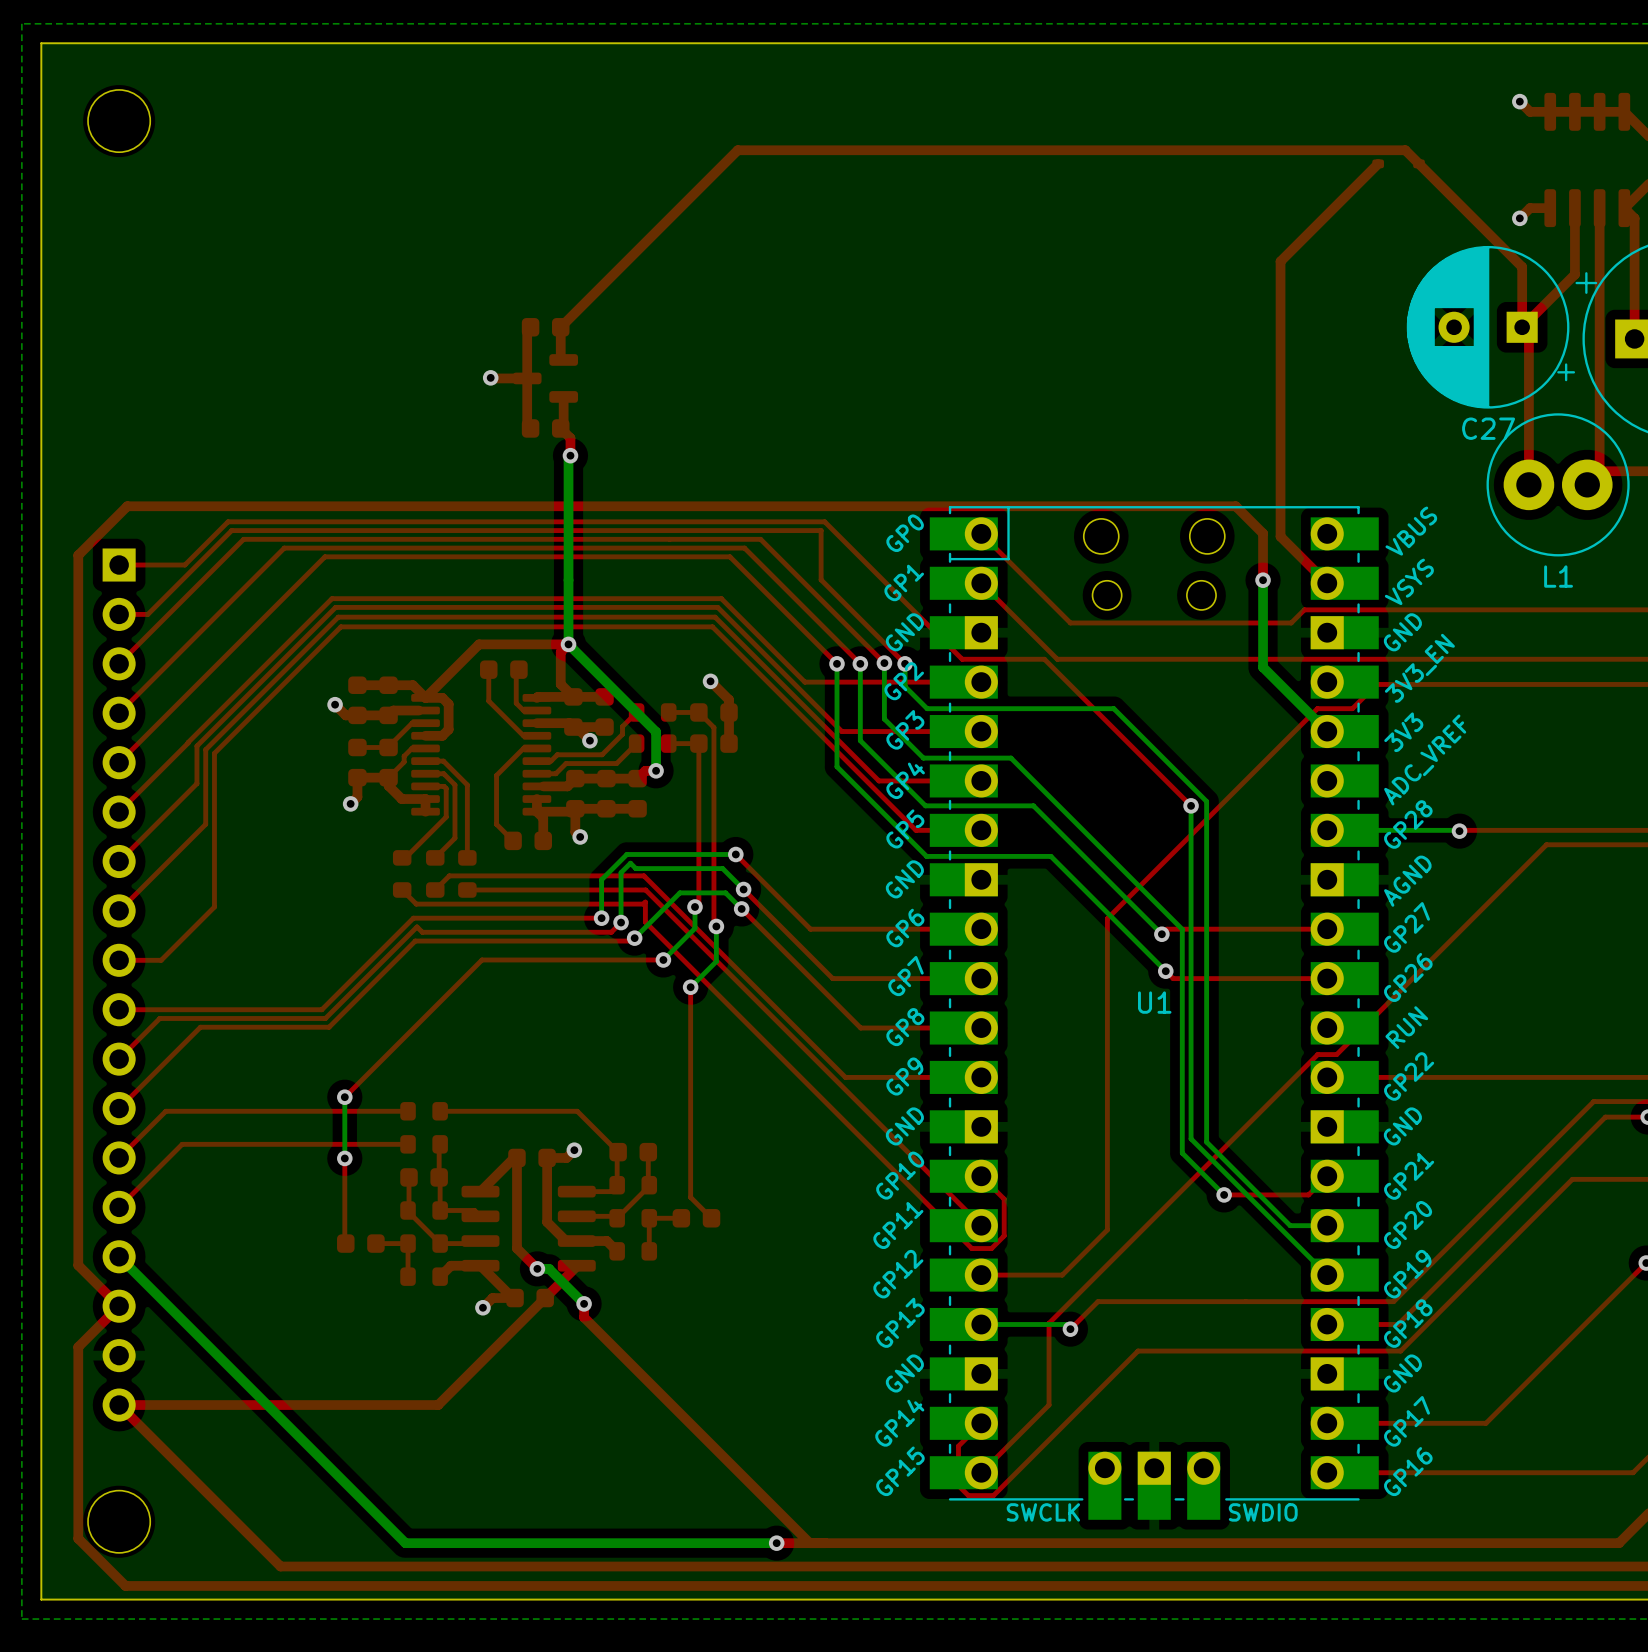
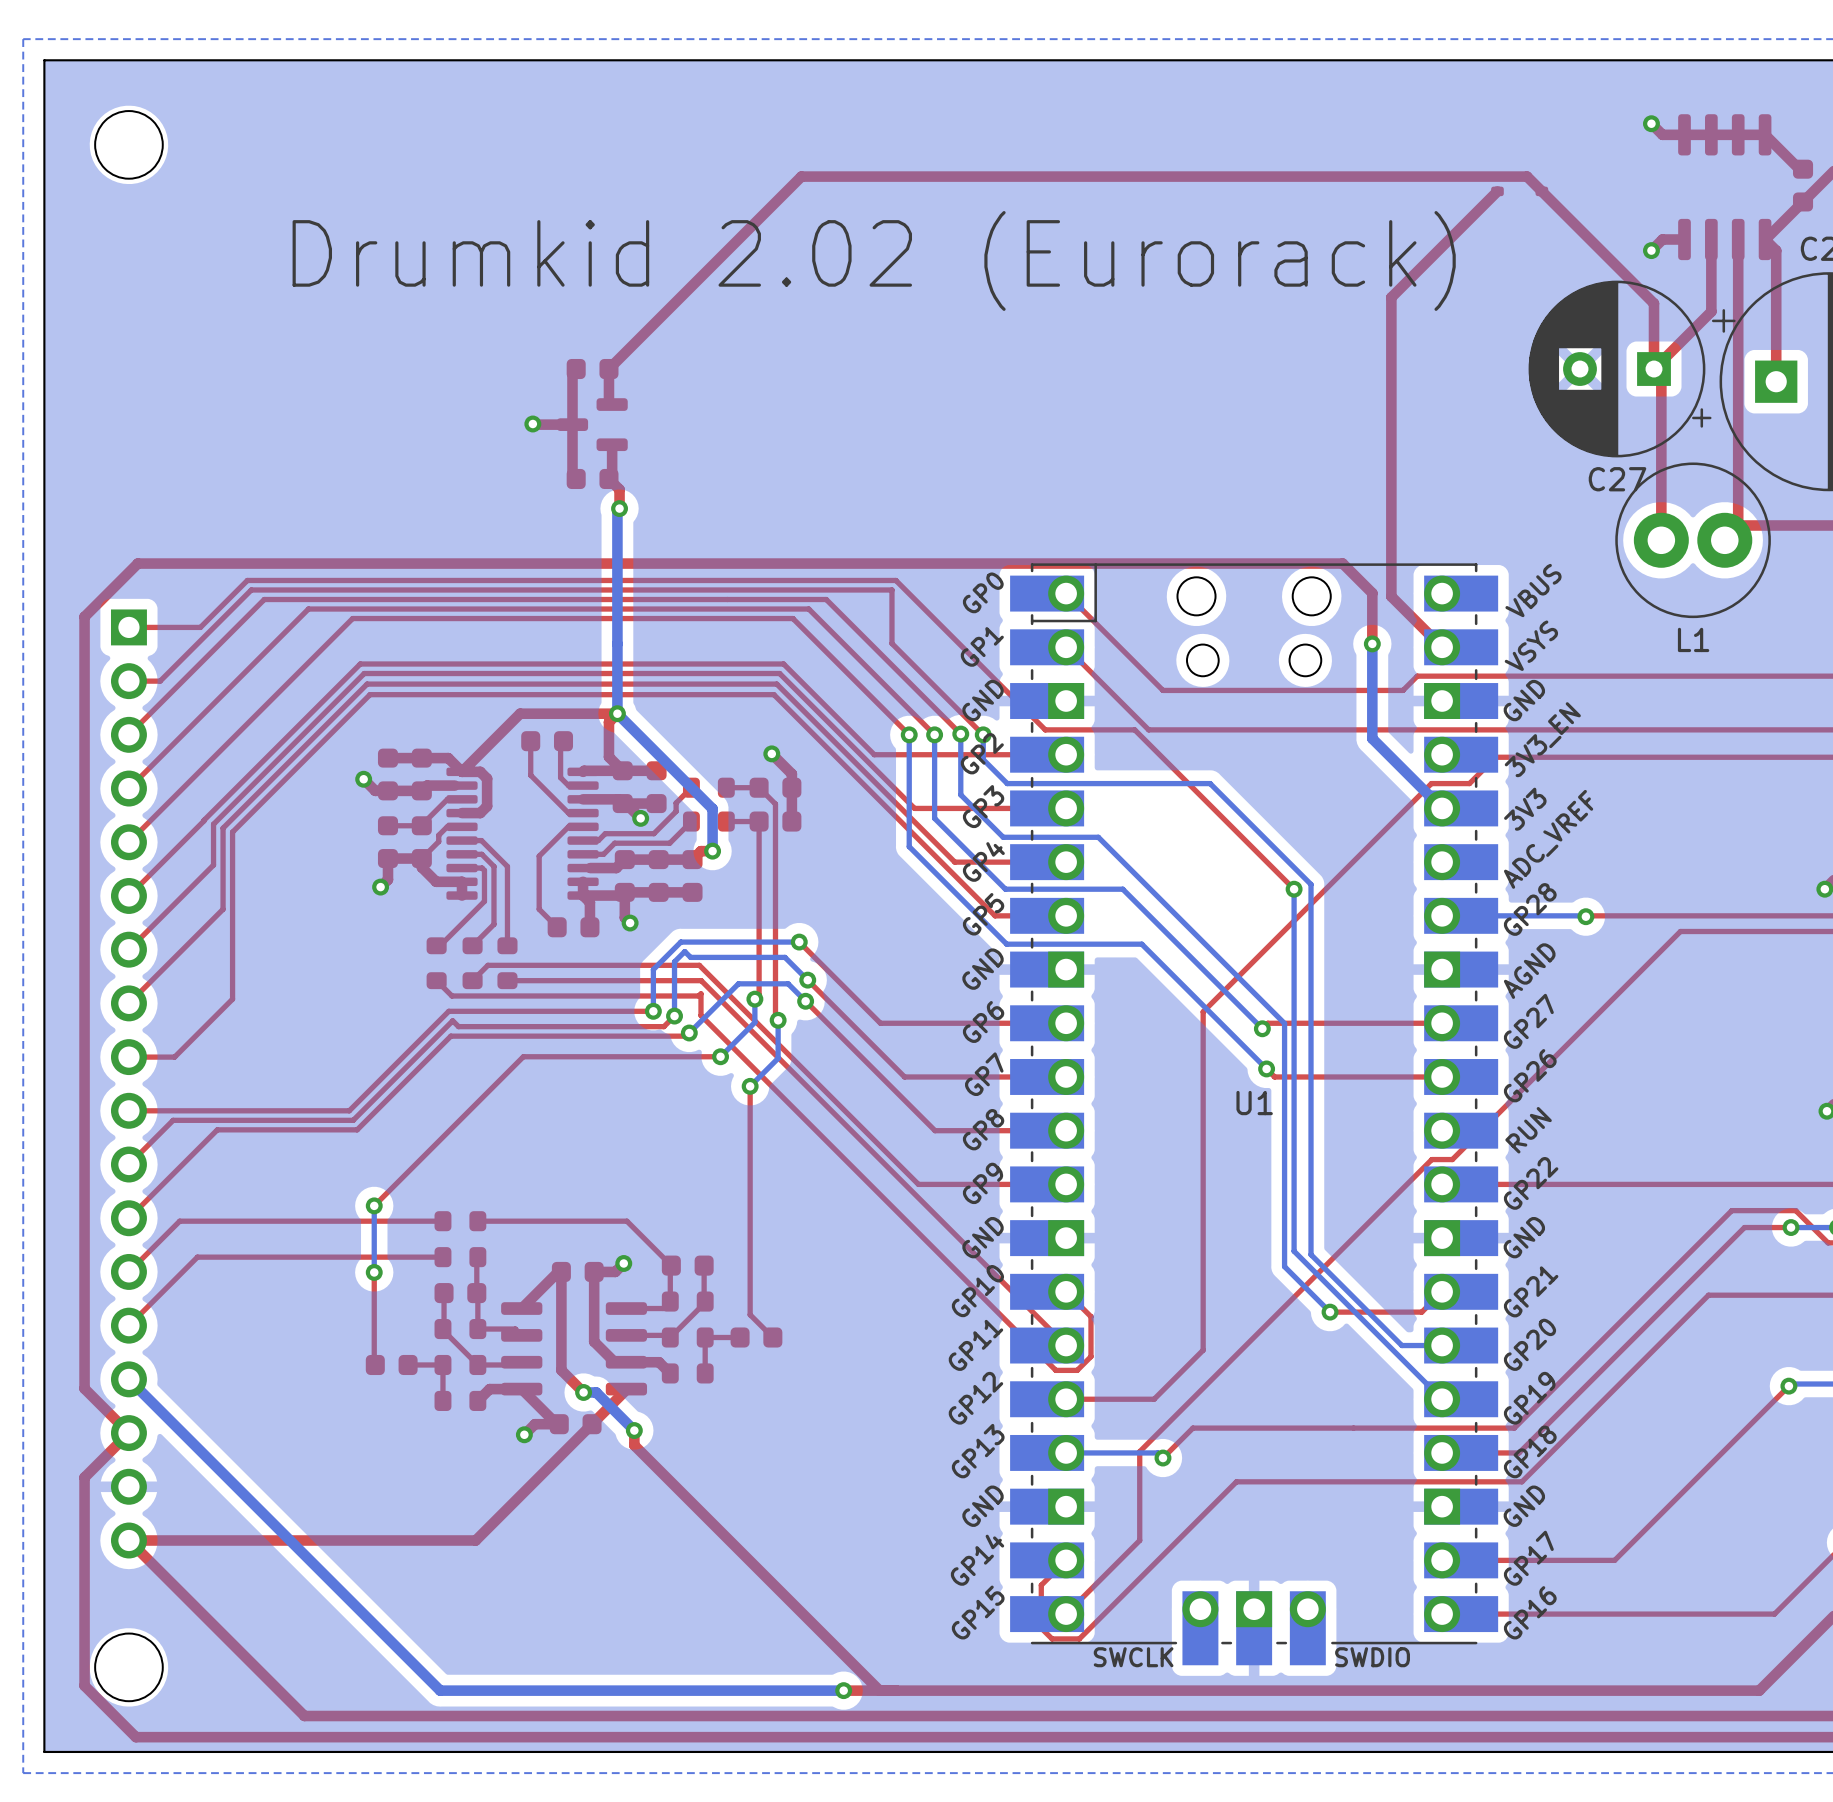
text: none -> Drumkid 2.02 (Eurorack) (874, 260)

